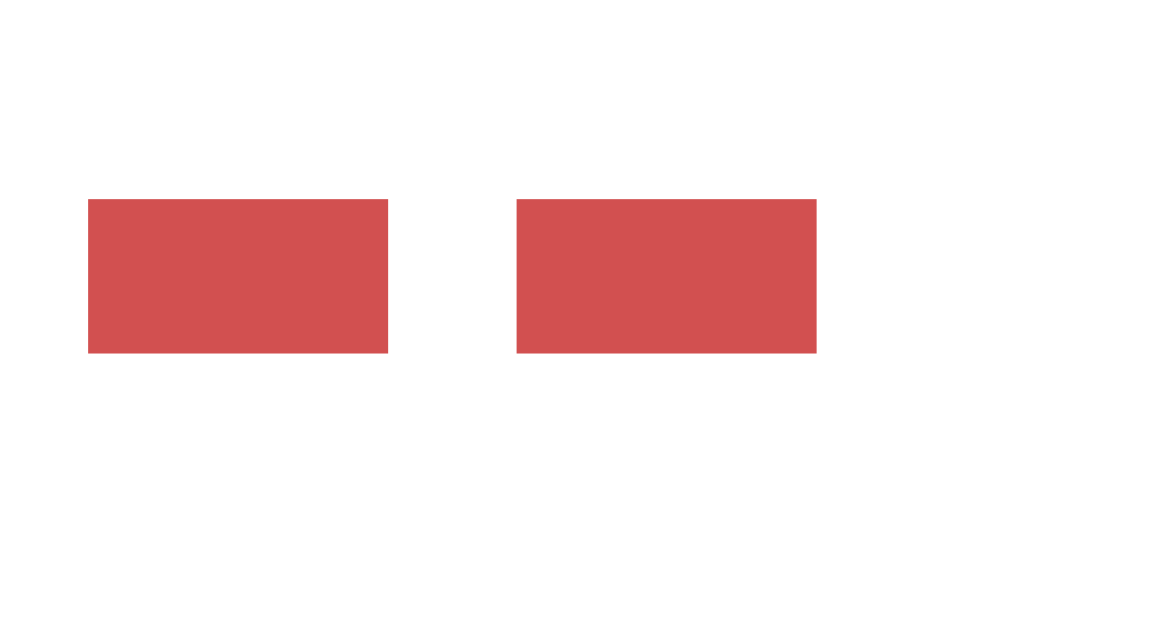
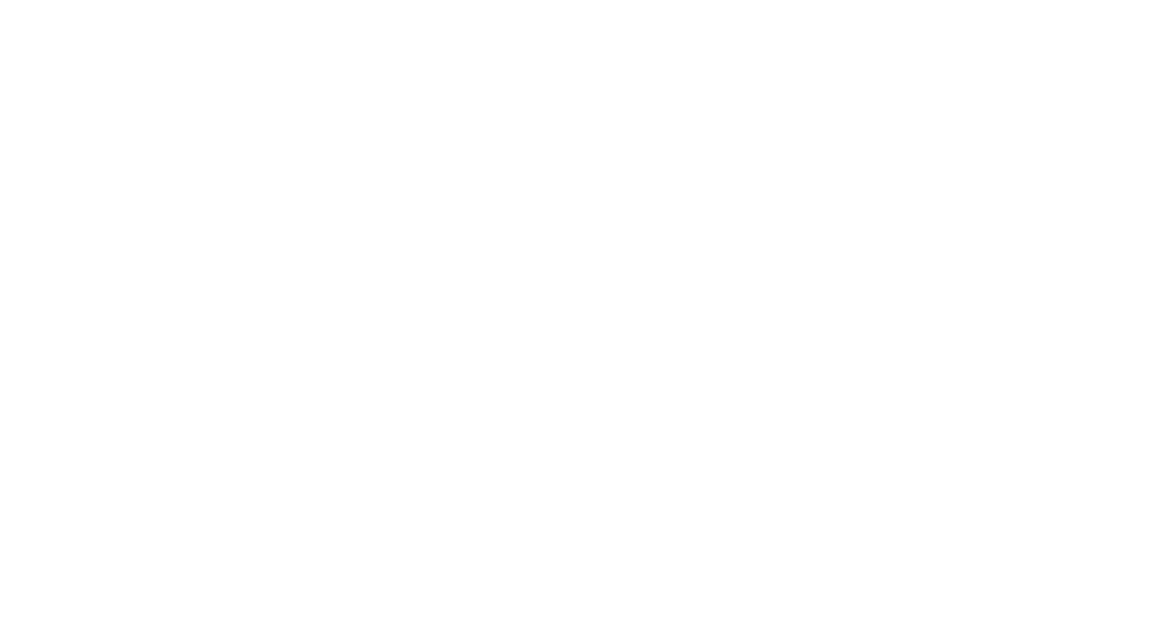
part: (452, 276) -> none

